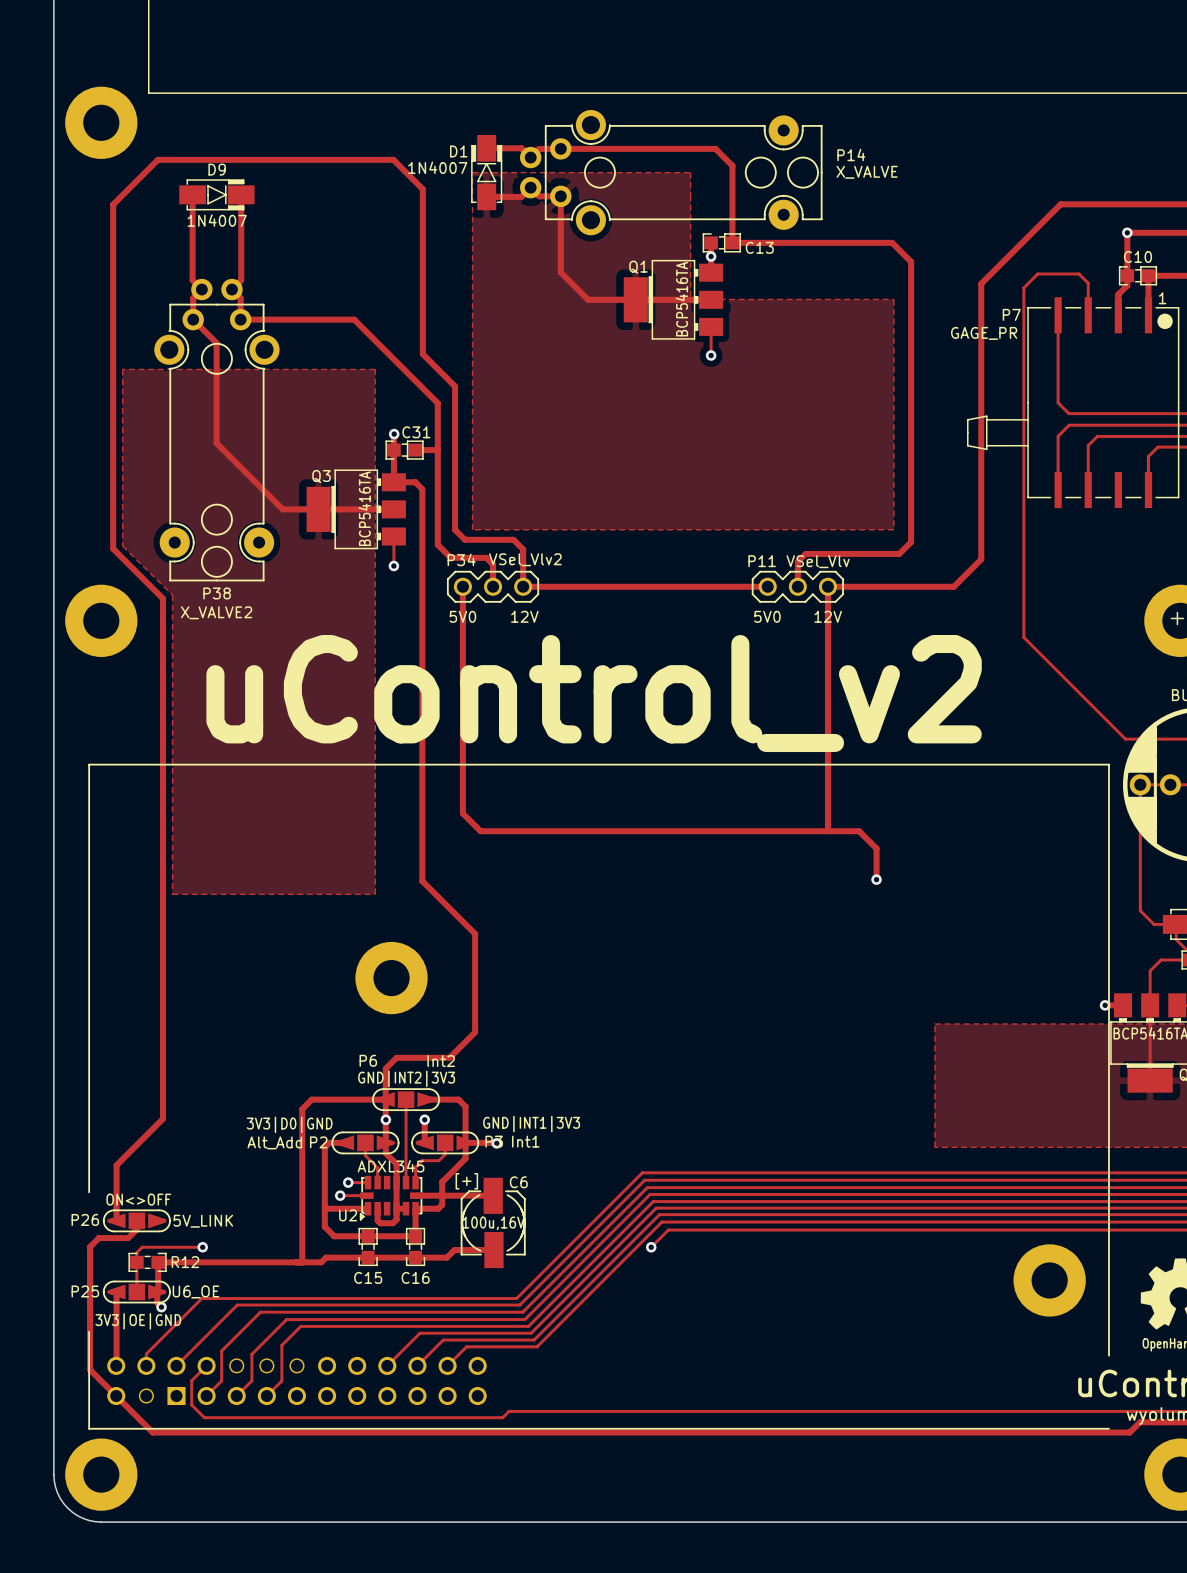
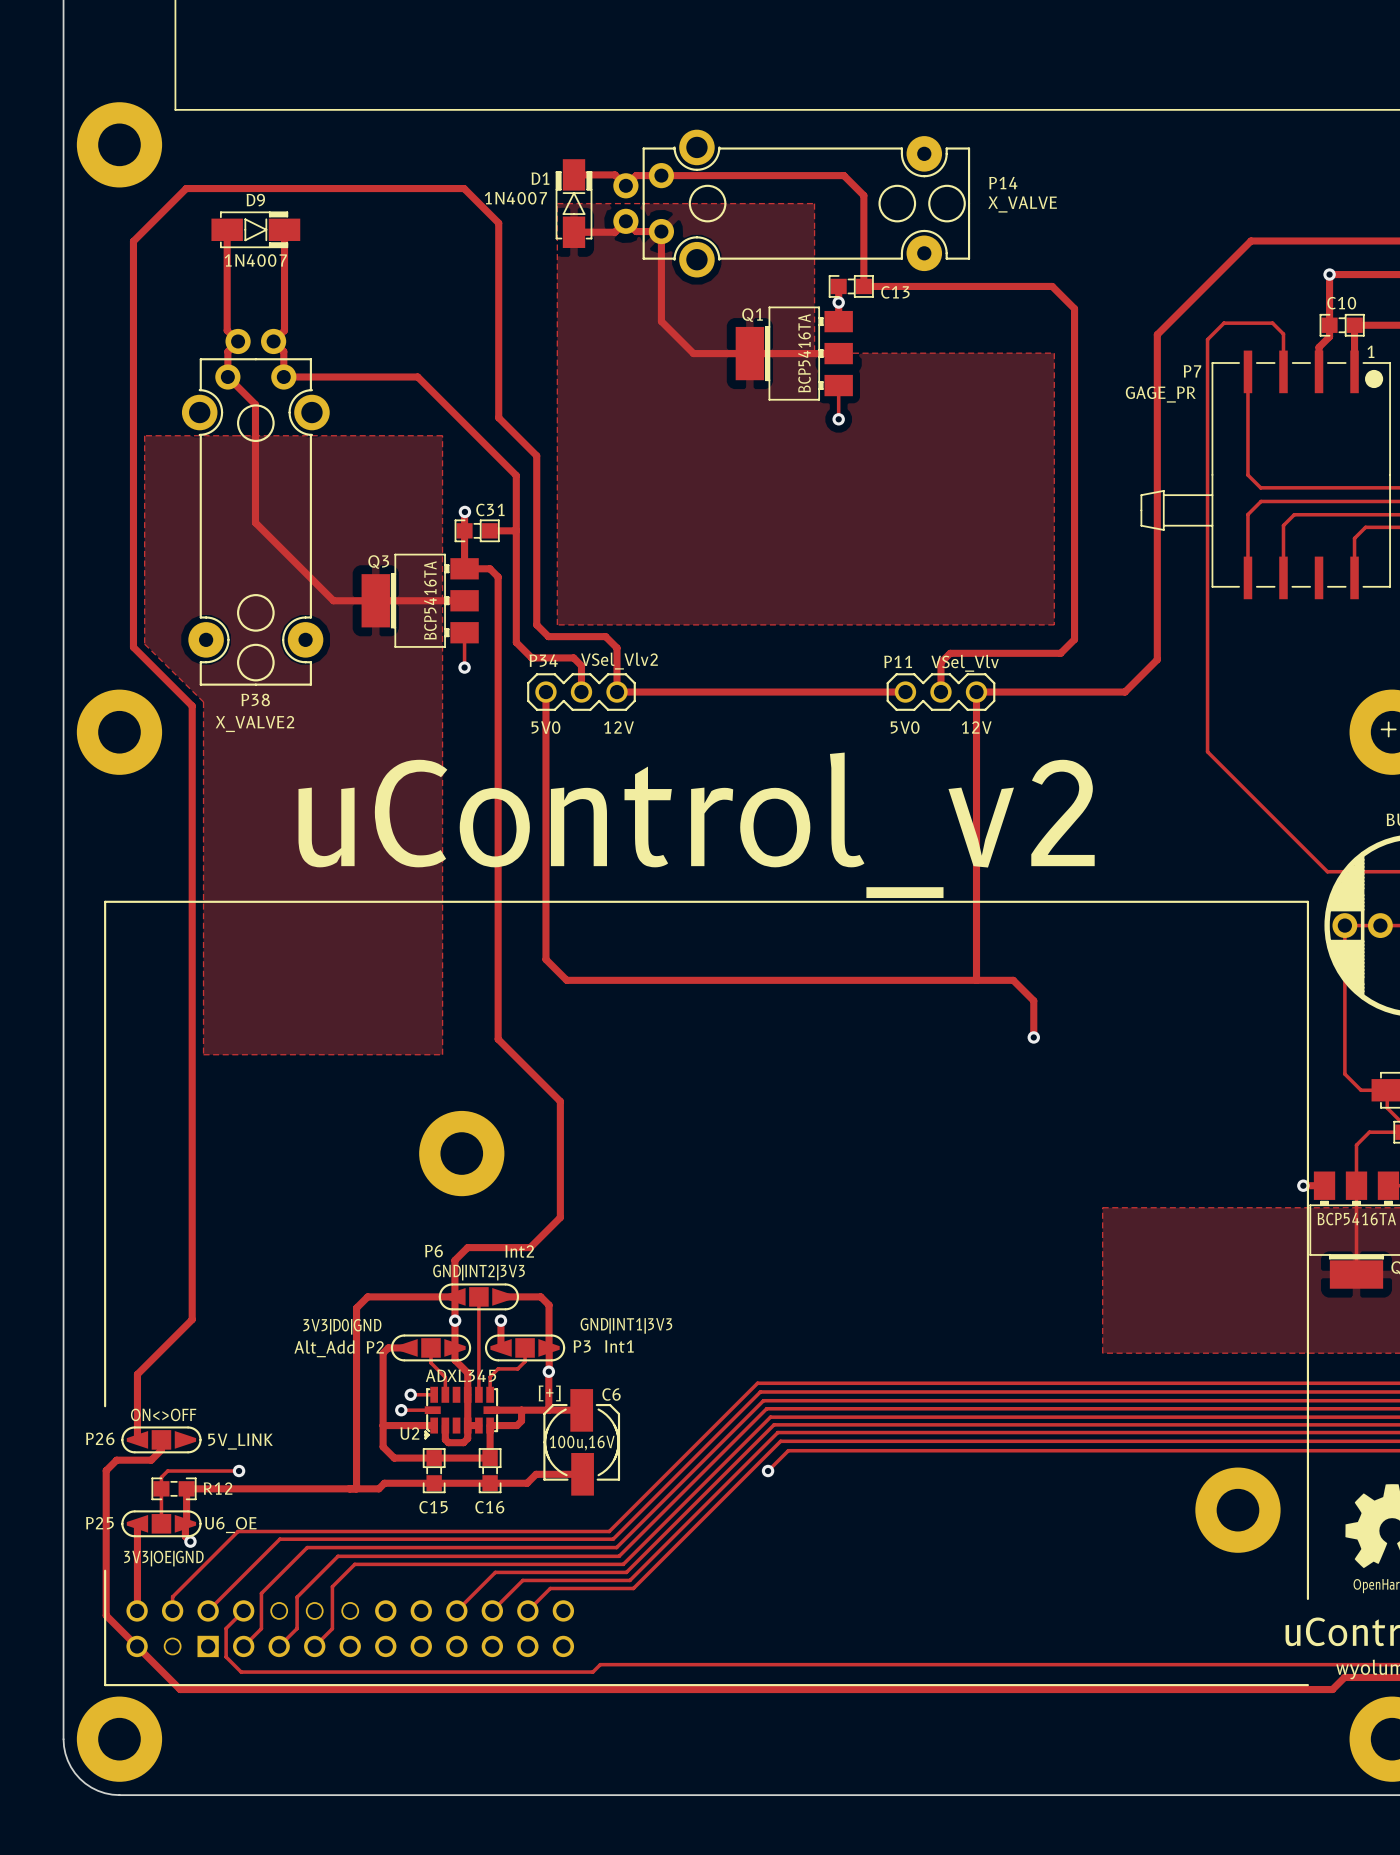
track: none -> (549, 1348) (548, 1410)
track: (496, 1143) (465, 1142) (465, 1158) (442, 1181) (442, 1195) -> none
via position: (496, 1143) -> (548, 1371)

